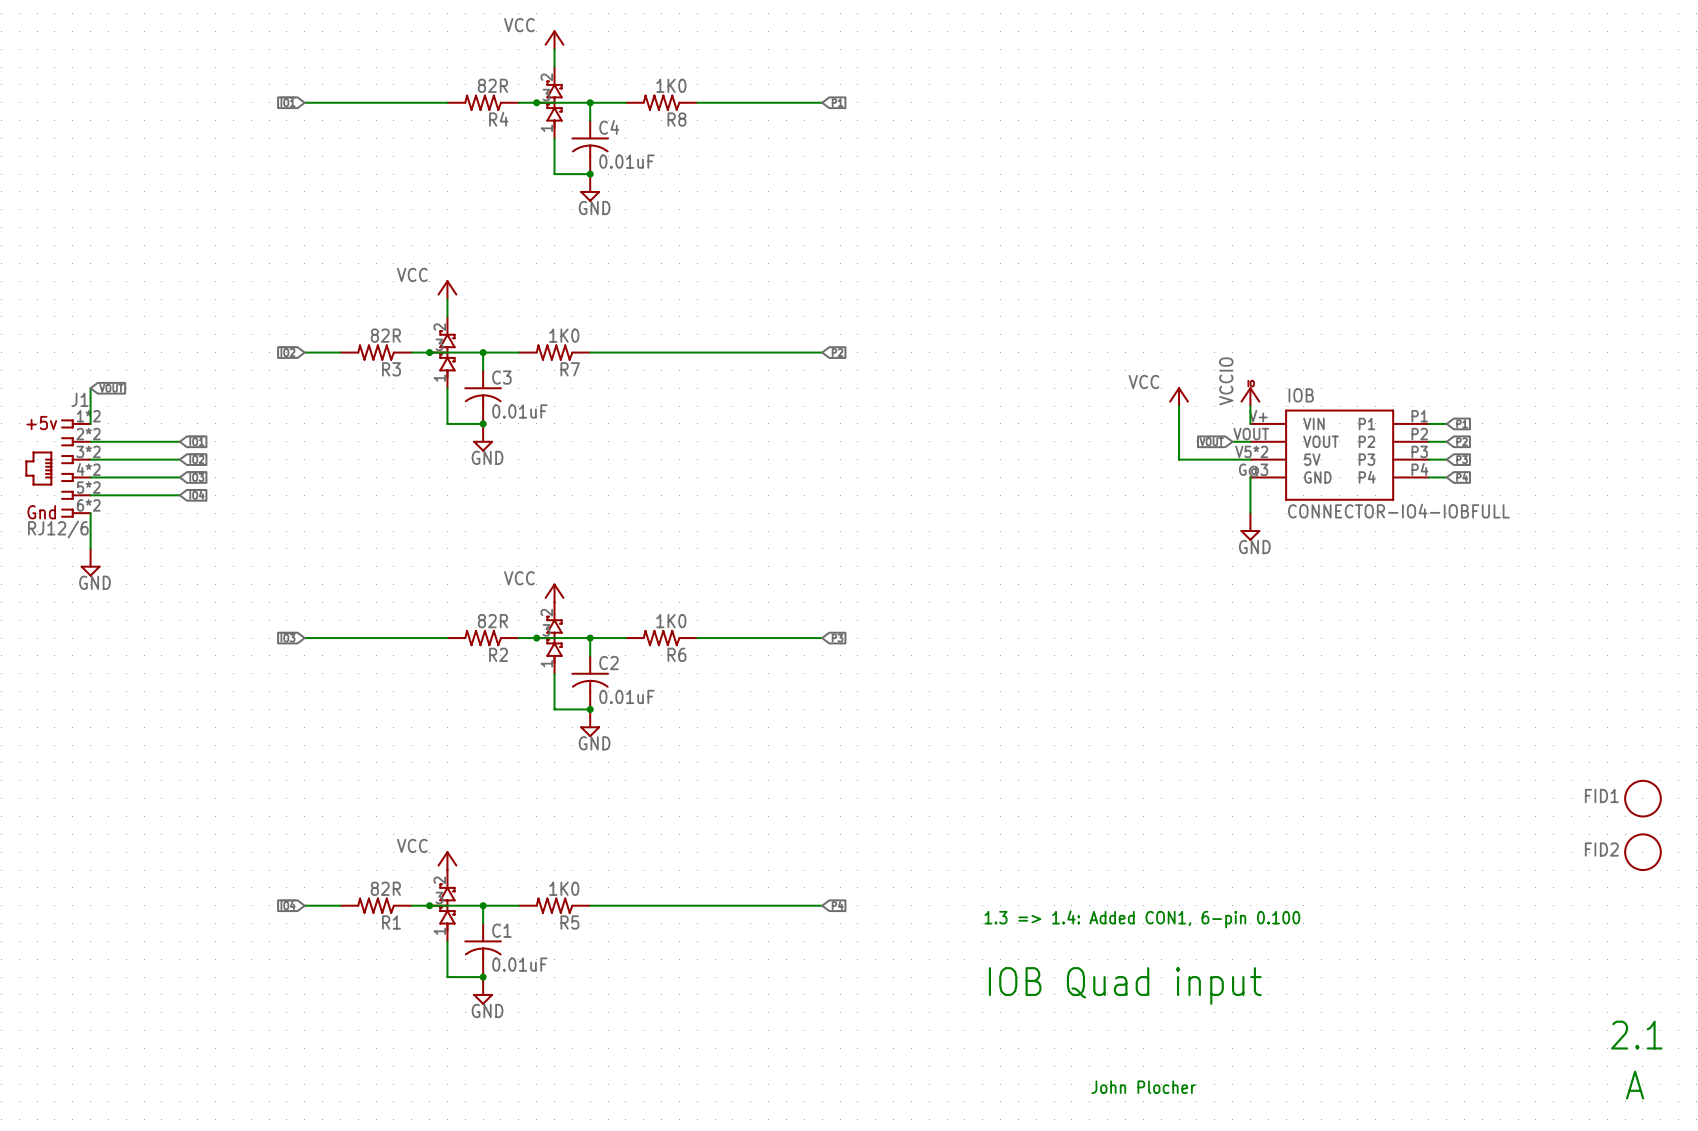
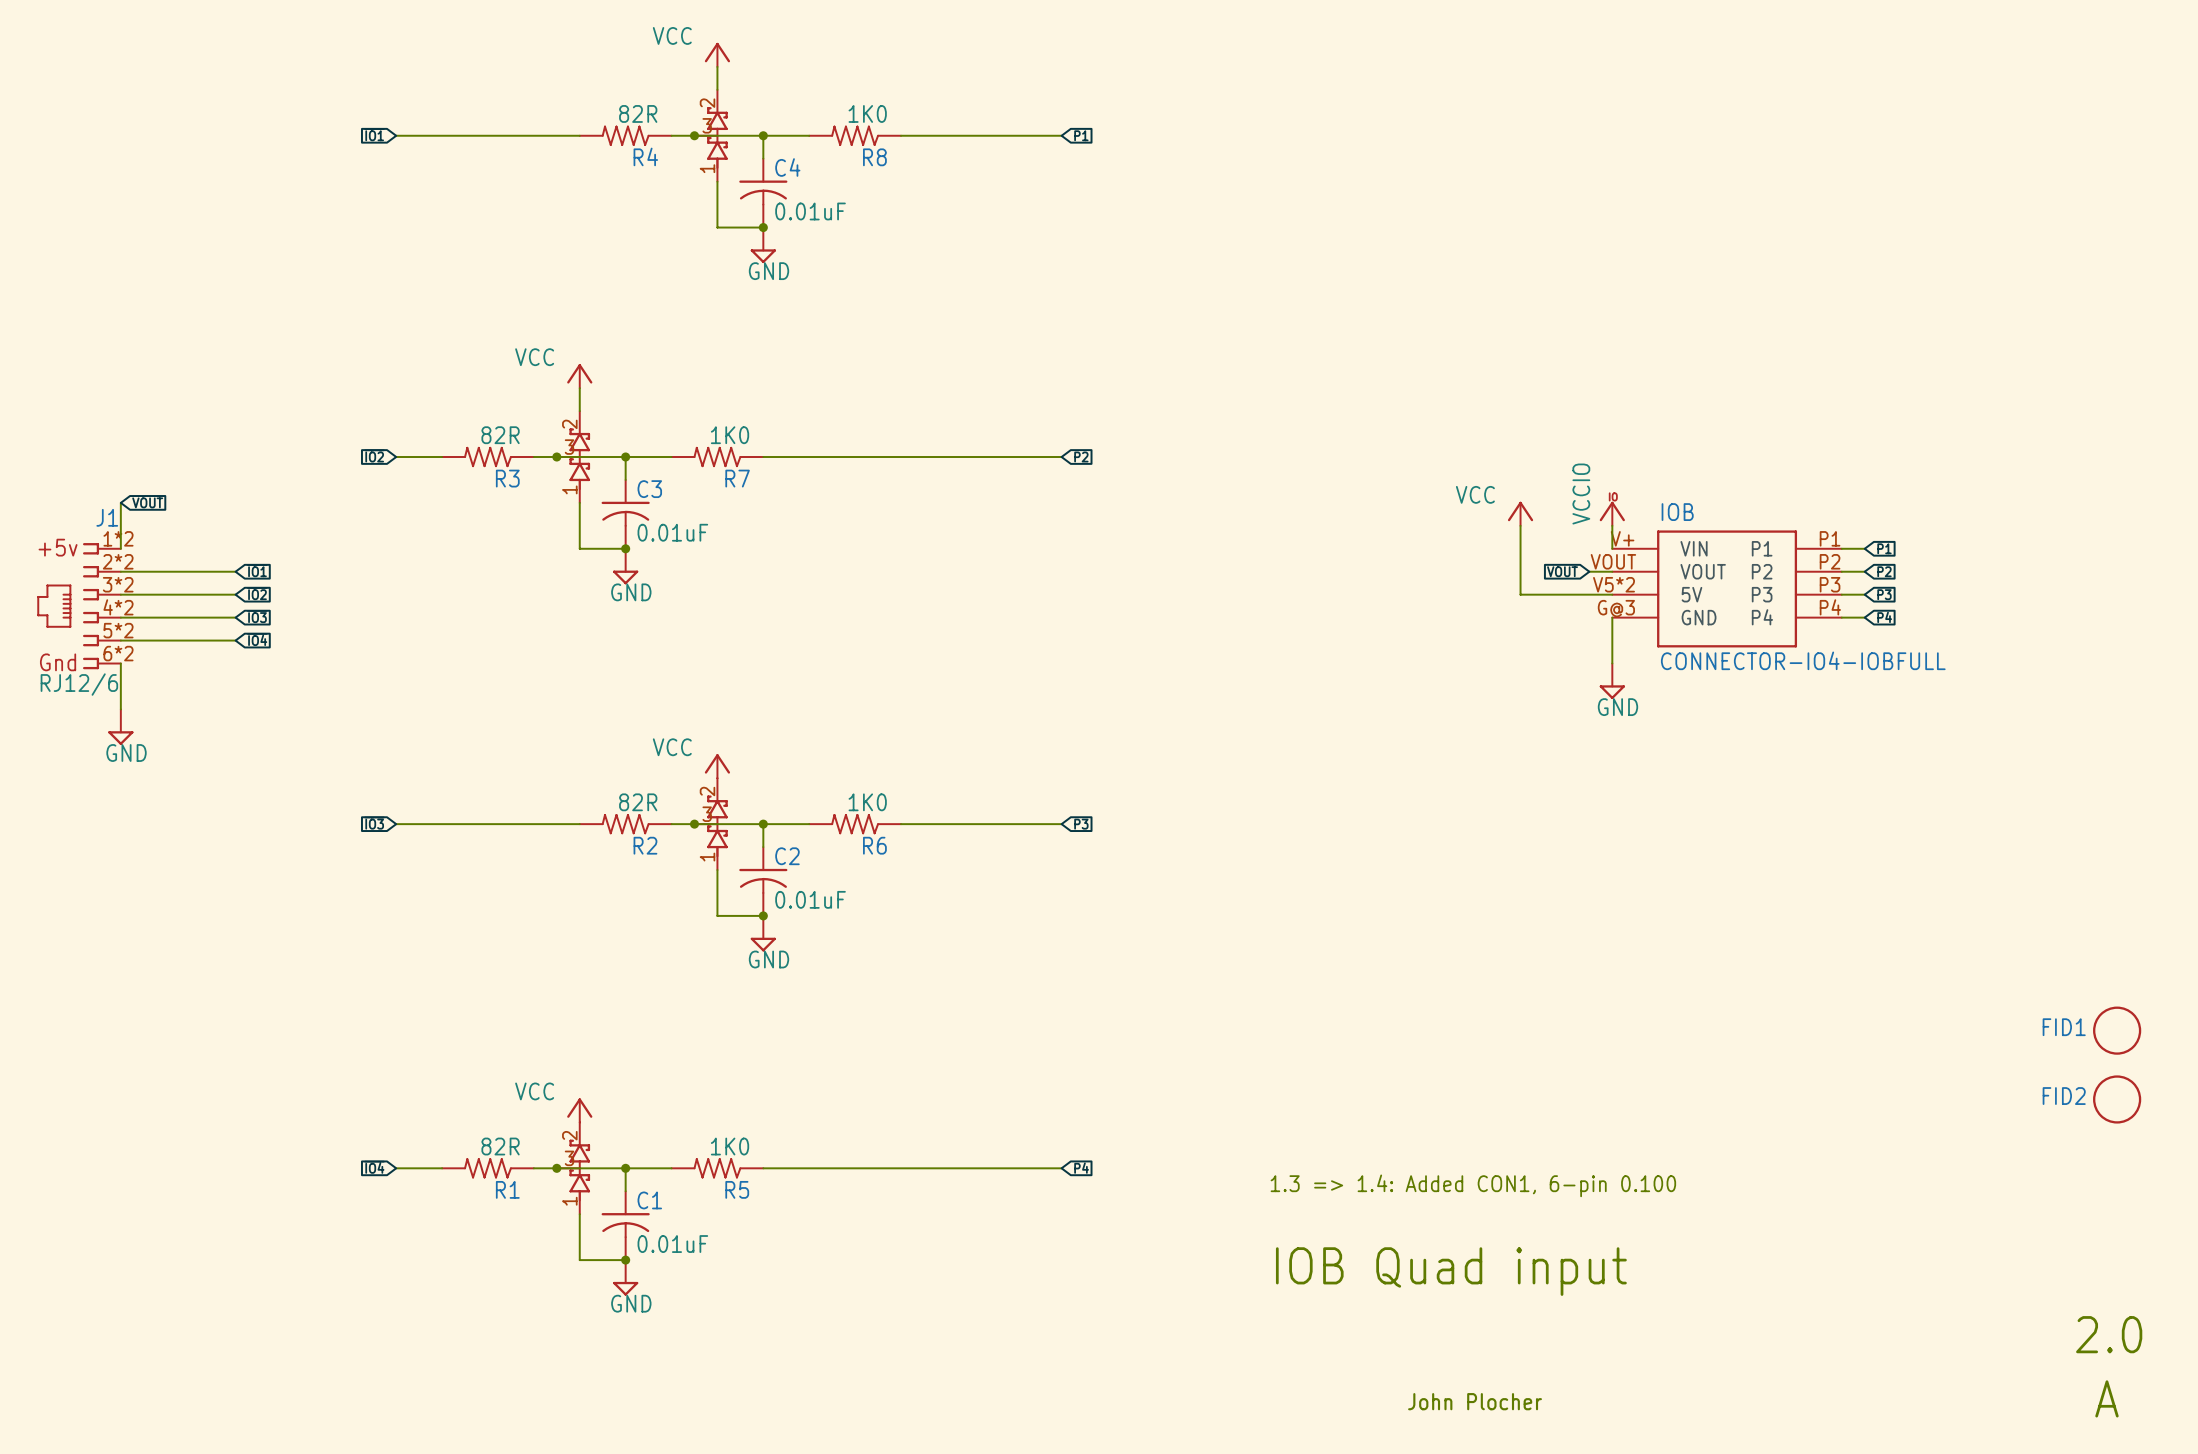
text: 2.1 (1636, 1035) -> 2.0 (2109, 1334)

